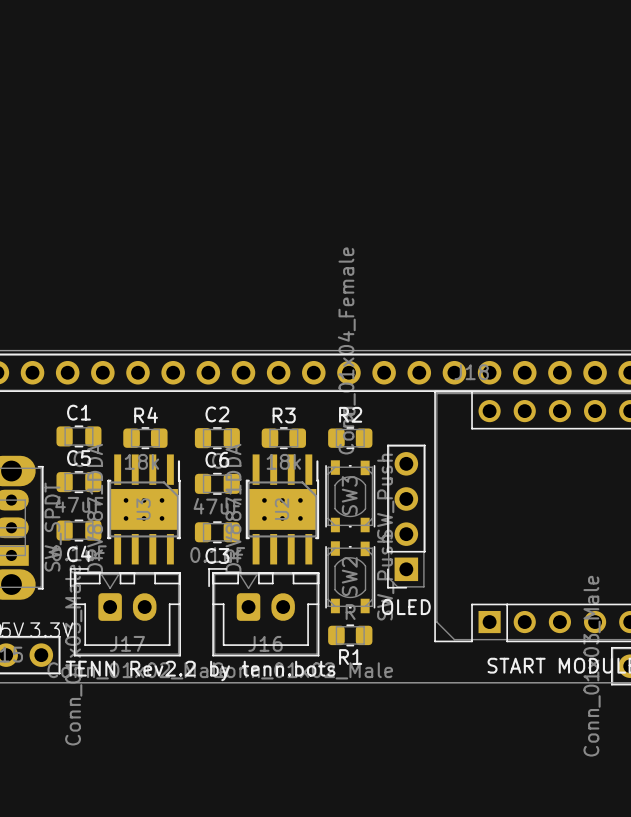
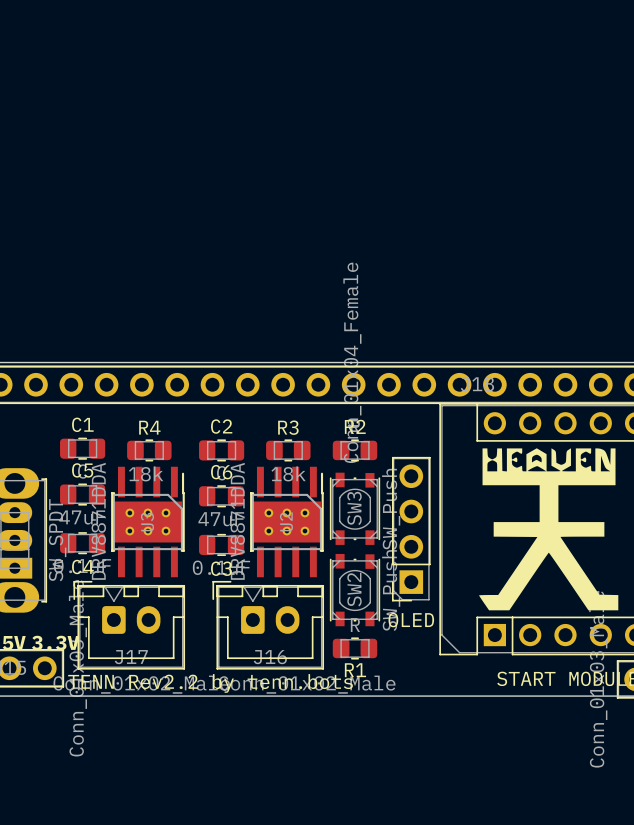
drawing: none -> [479, 448, 619, 611]

